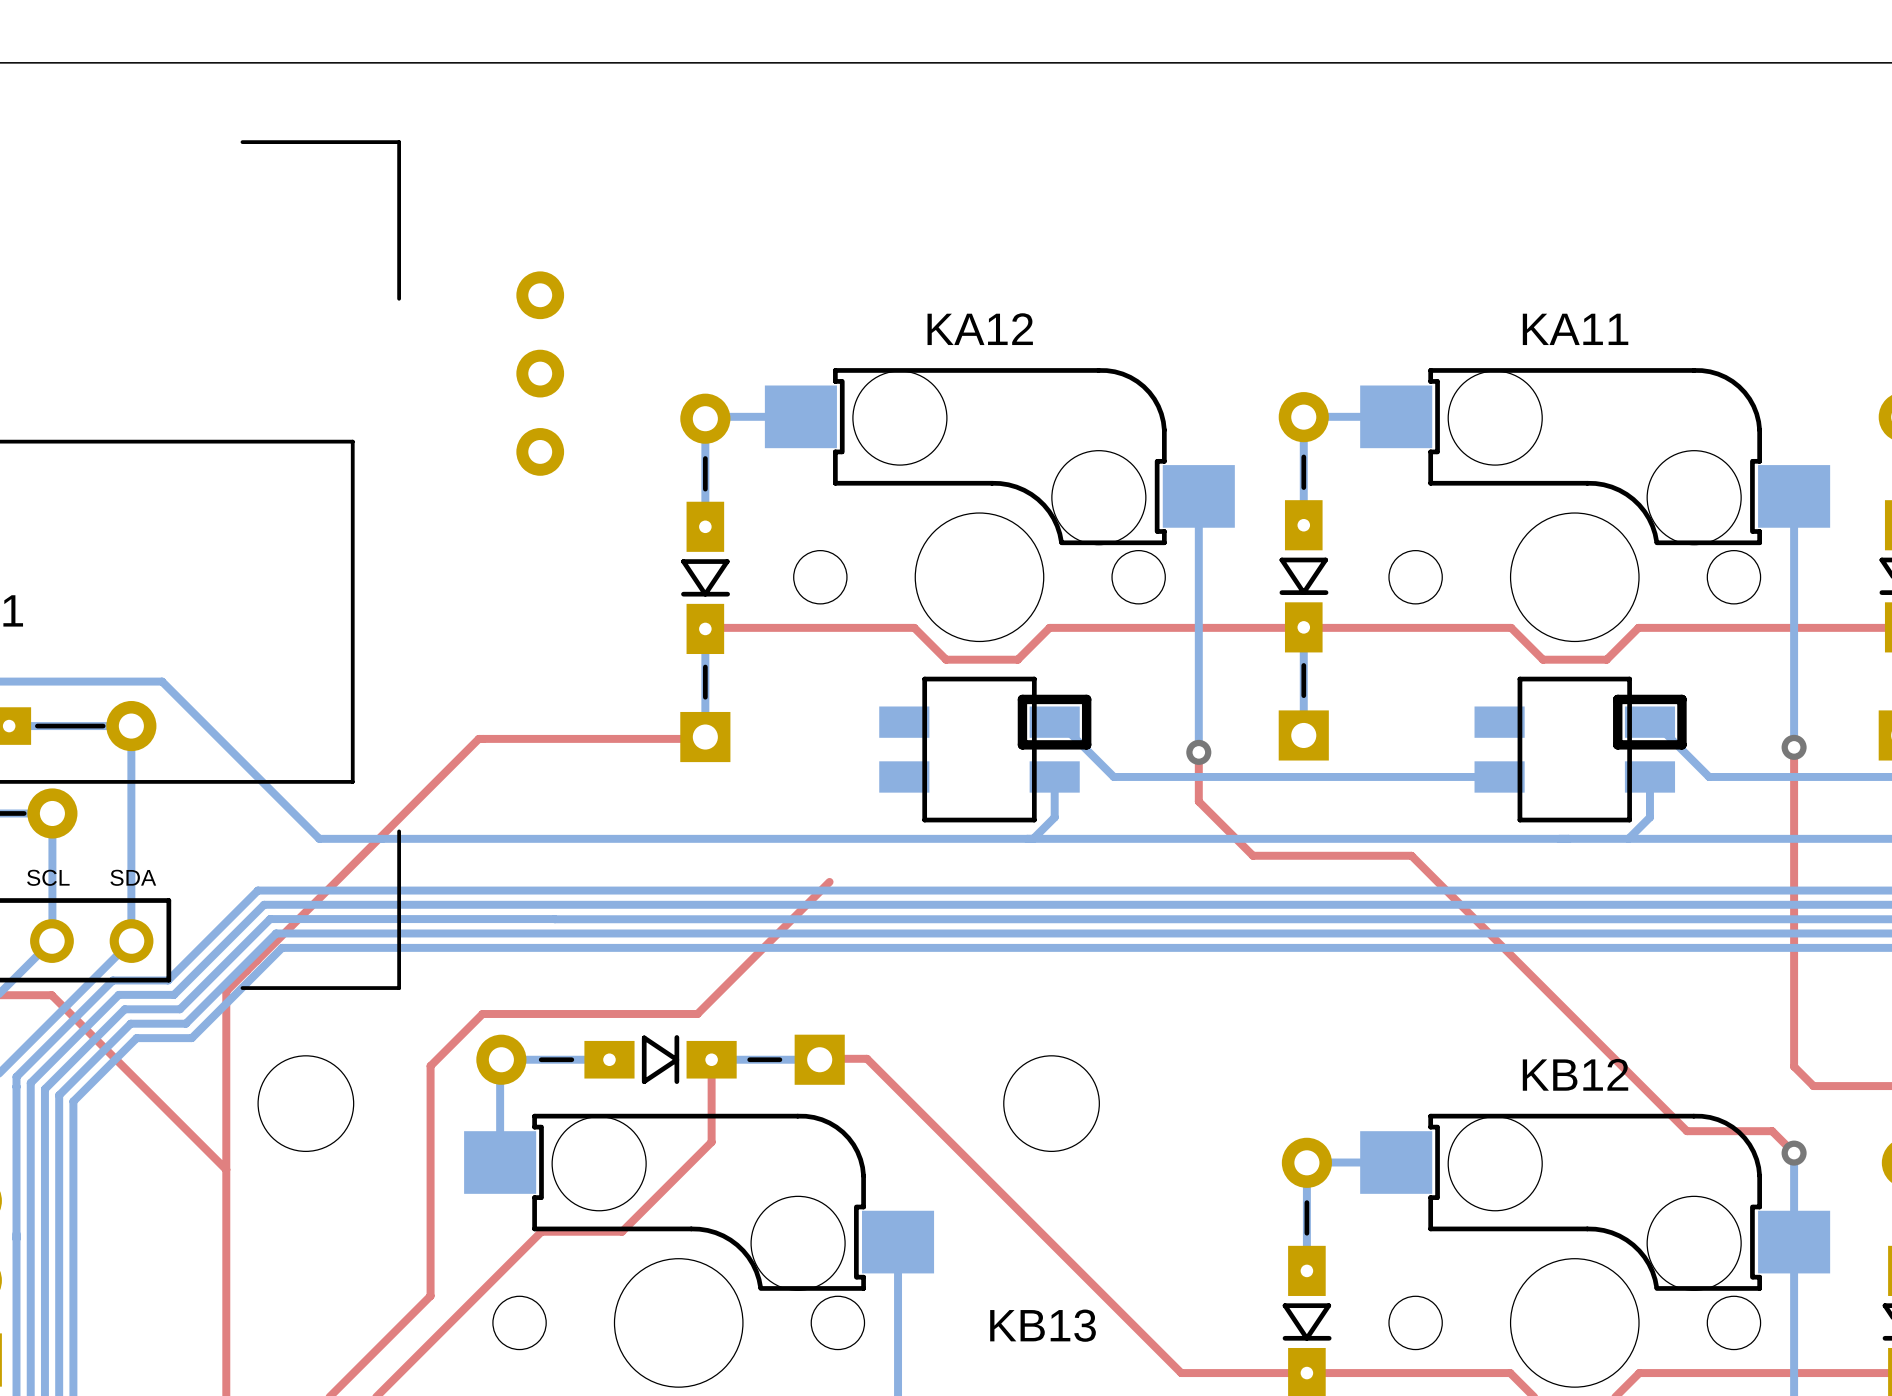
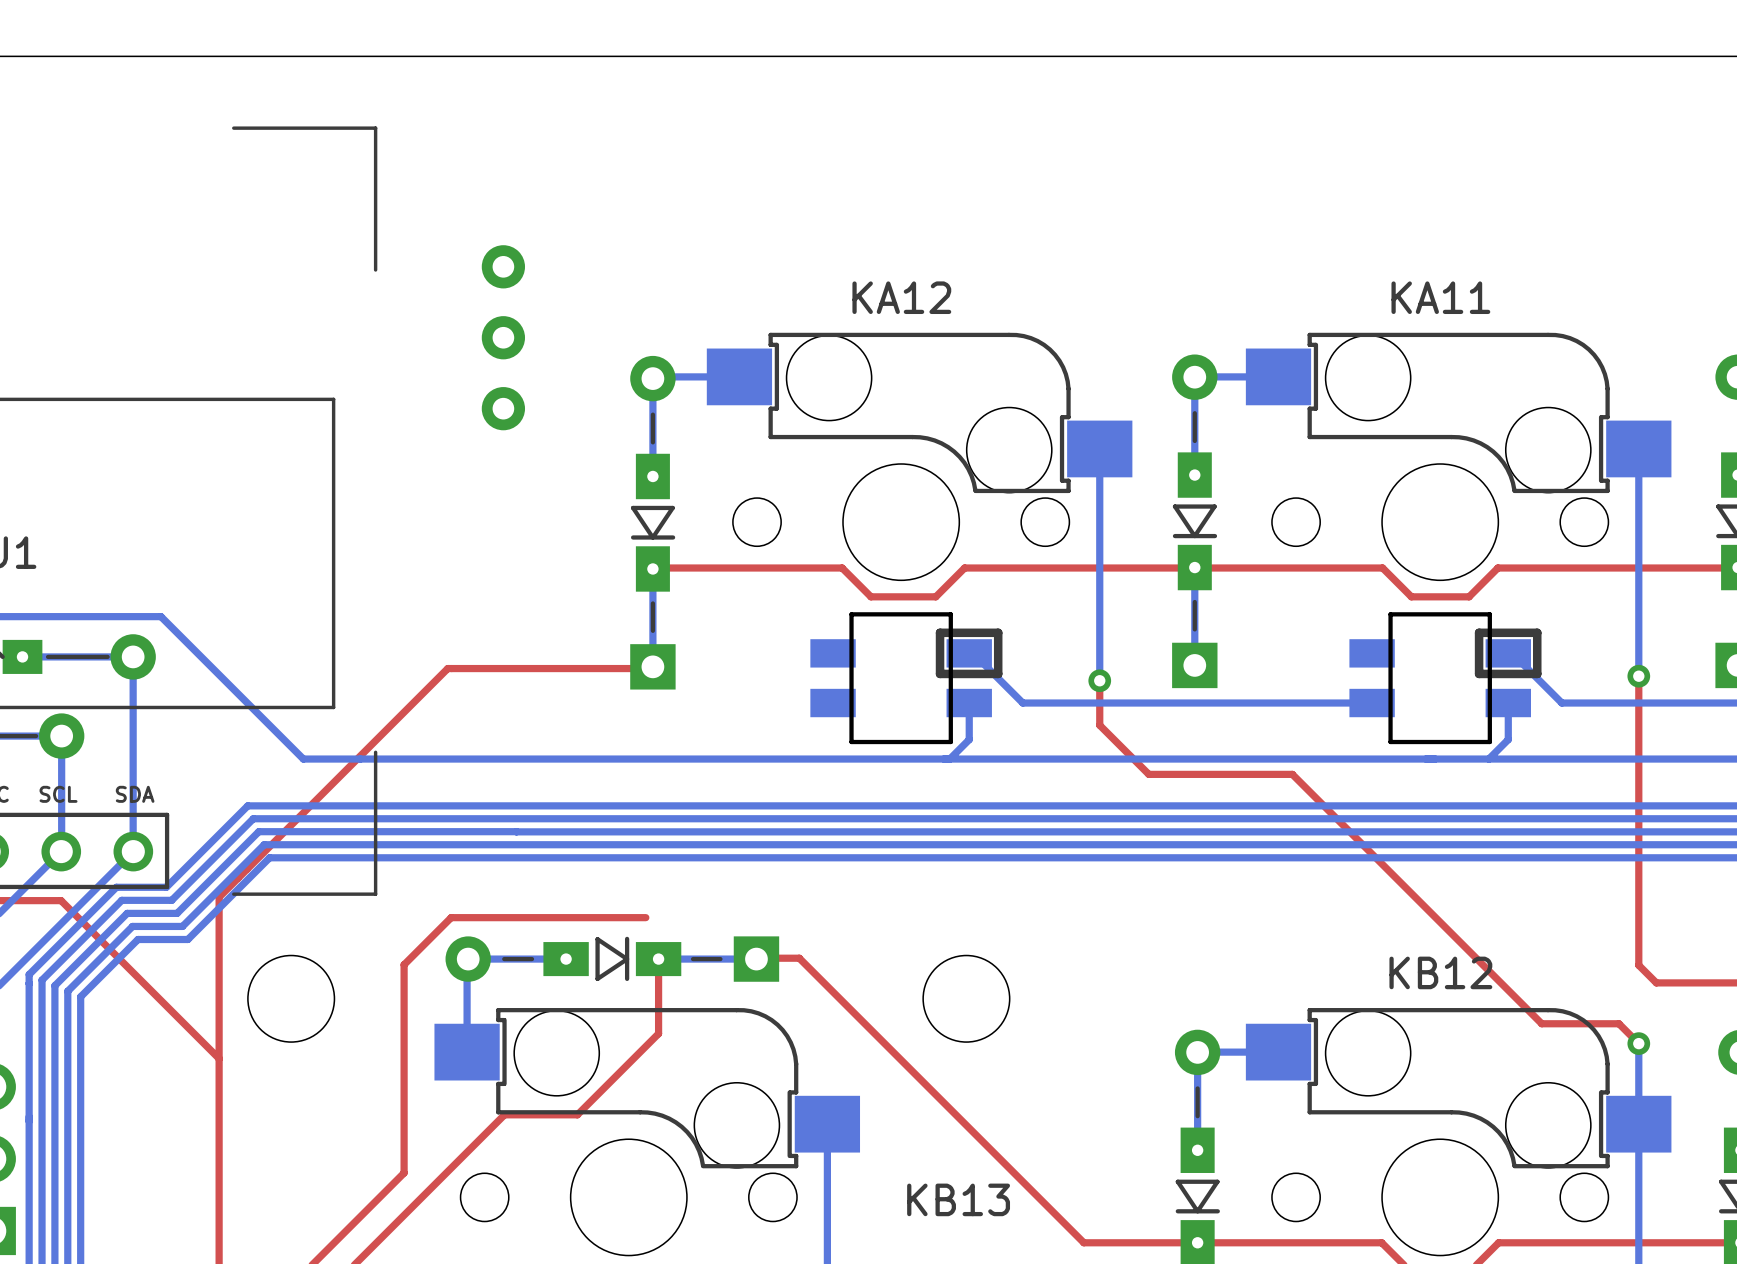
top track: (829, 881) (697, 1014) -> none

